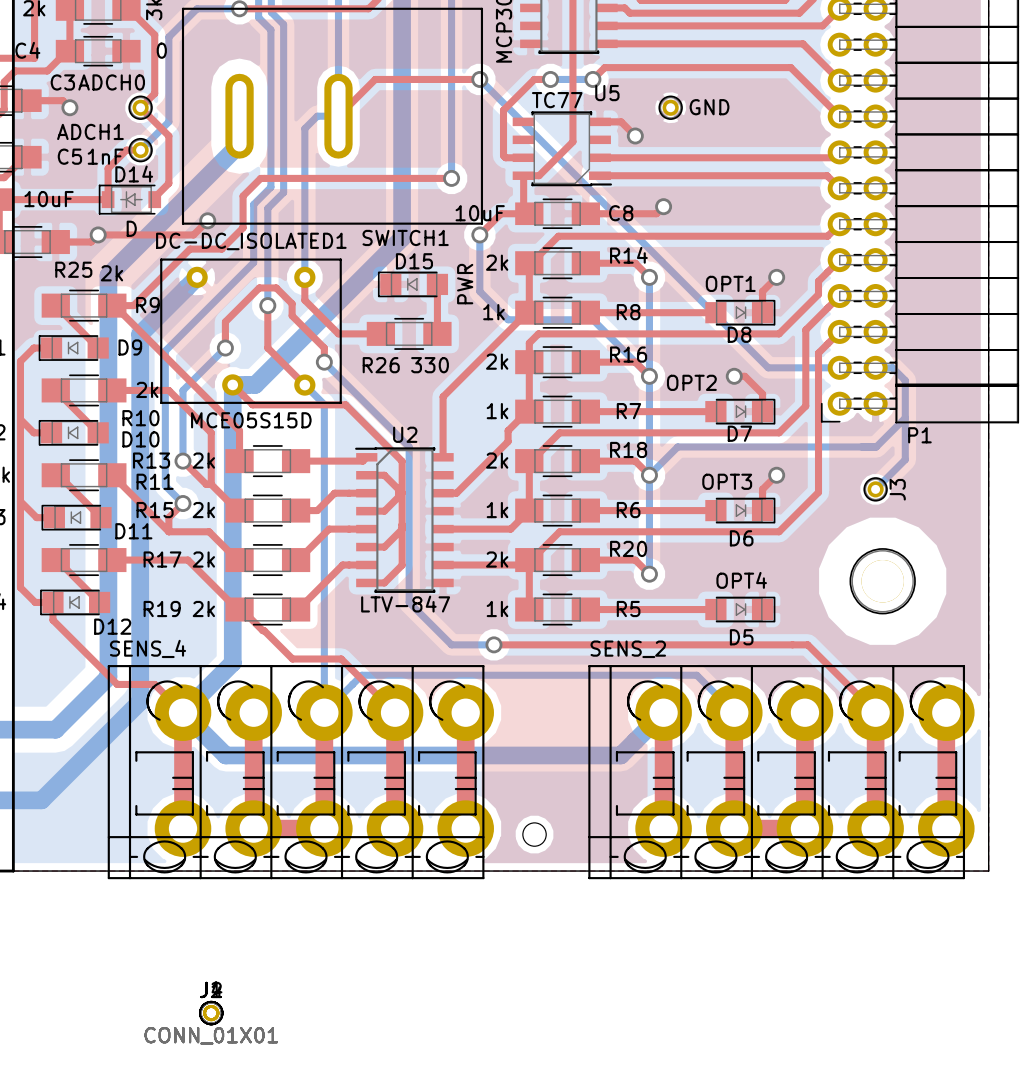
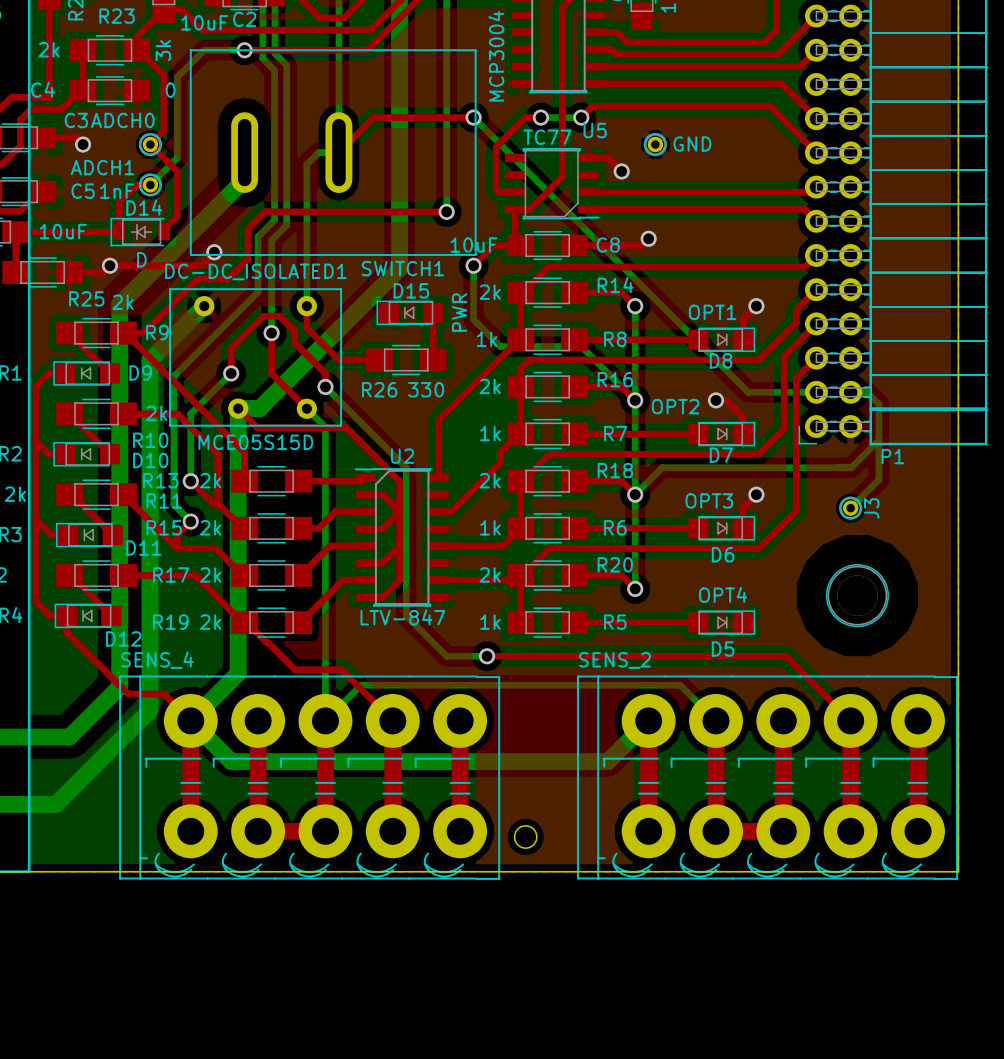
SENS_4 footprint: [107, 665, 494, 880] -> [119, 675, 501, 880]
SENS_2 footprint: [588, 665, 975, 880] -> [576, 675, 959, 880]
part: CONN_01X01 (211, 1013) -> none
part: CONN_01X01 (211, 1013) -> none
part: CONN_01X01 (211, 1013) -> none

